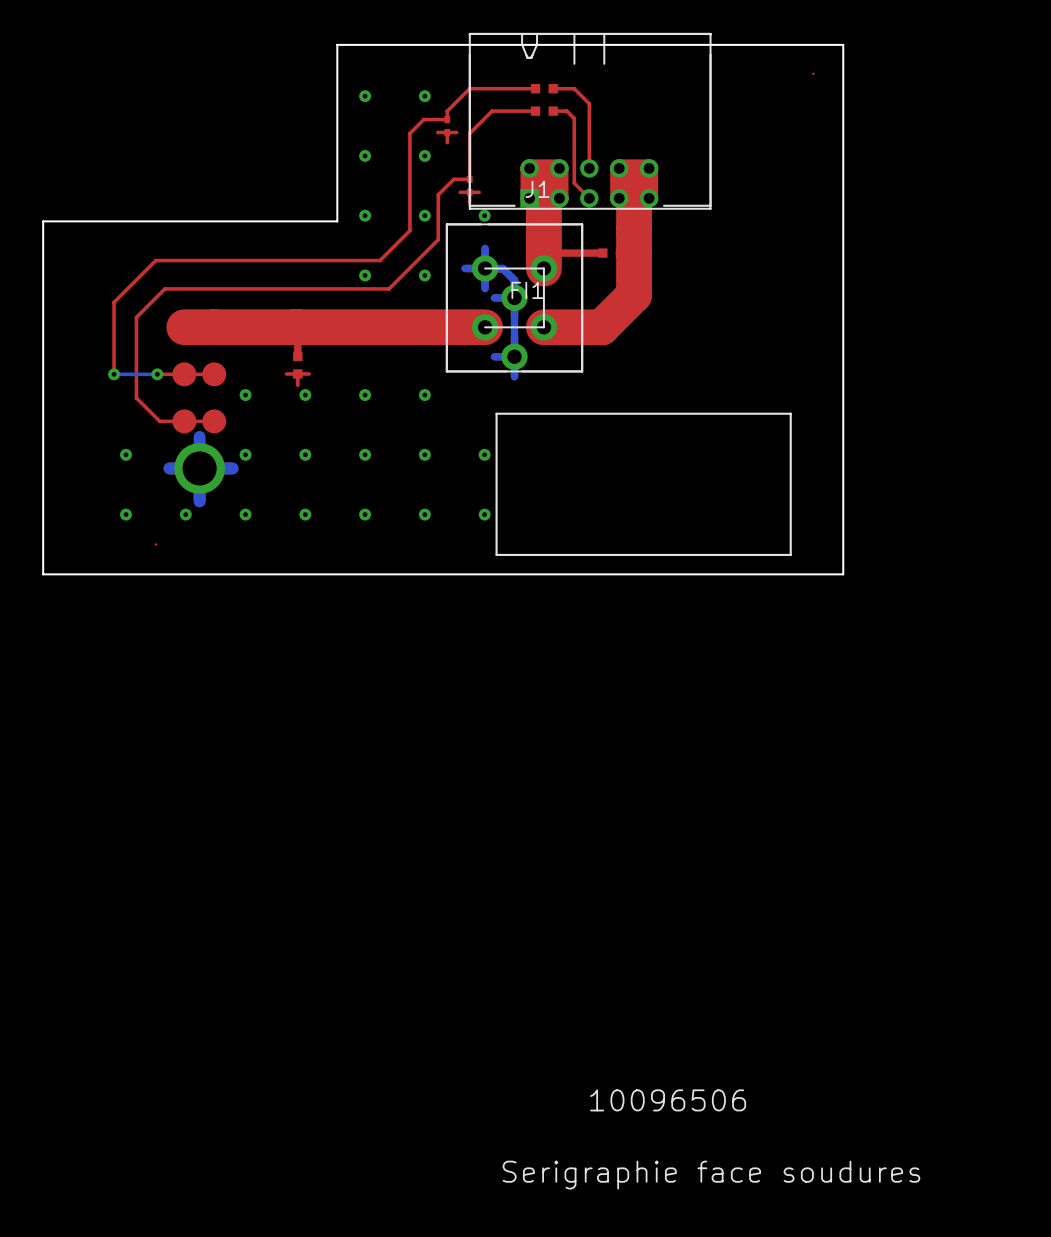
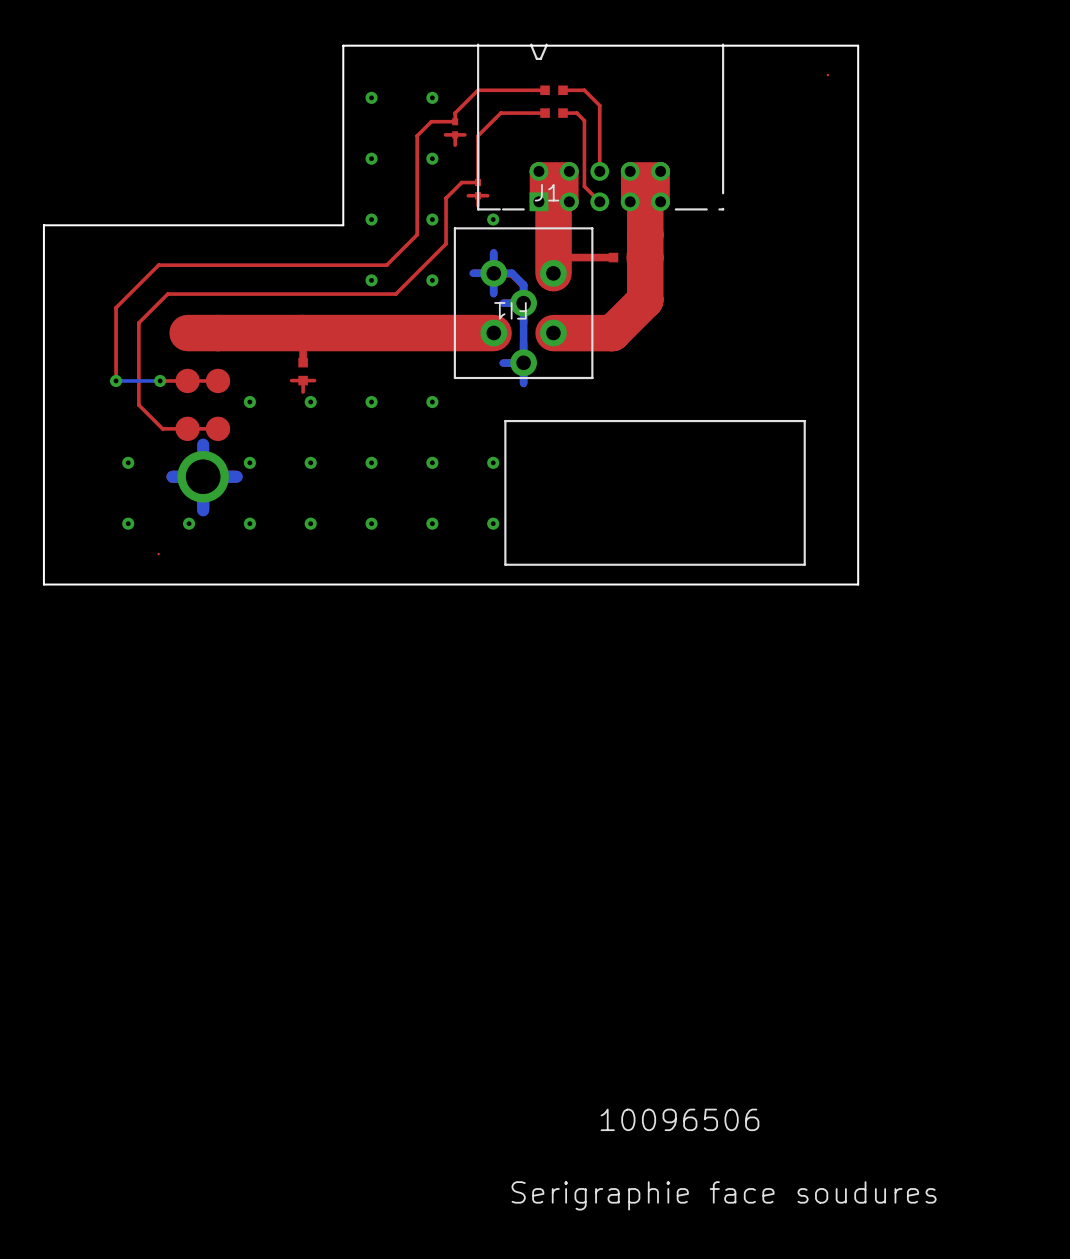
J1 footprint: [468, 32, 712, 210] -> [477, 43, 725, 212]
FI1 footprint: [445, 223, 584, 373] -> [453, 227, 594, 380]
FI1 name position: FI1 (527, 290) -> FI1 (510, 310)

